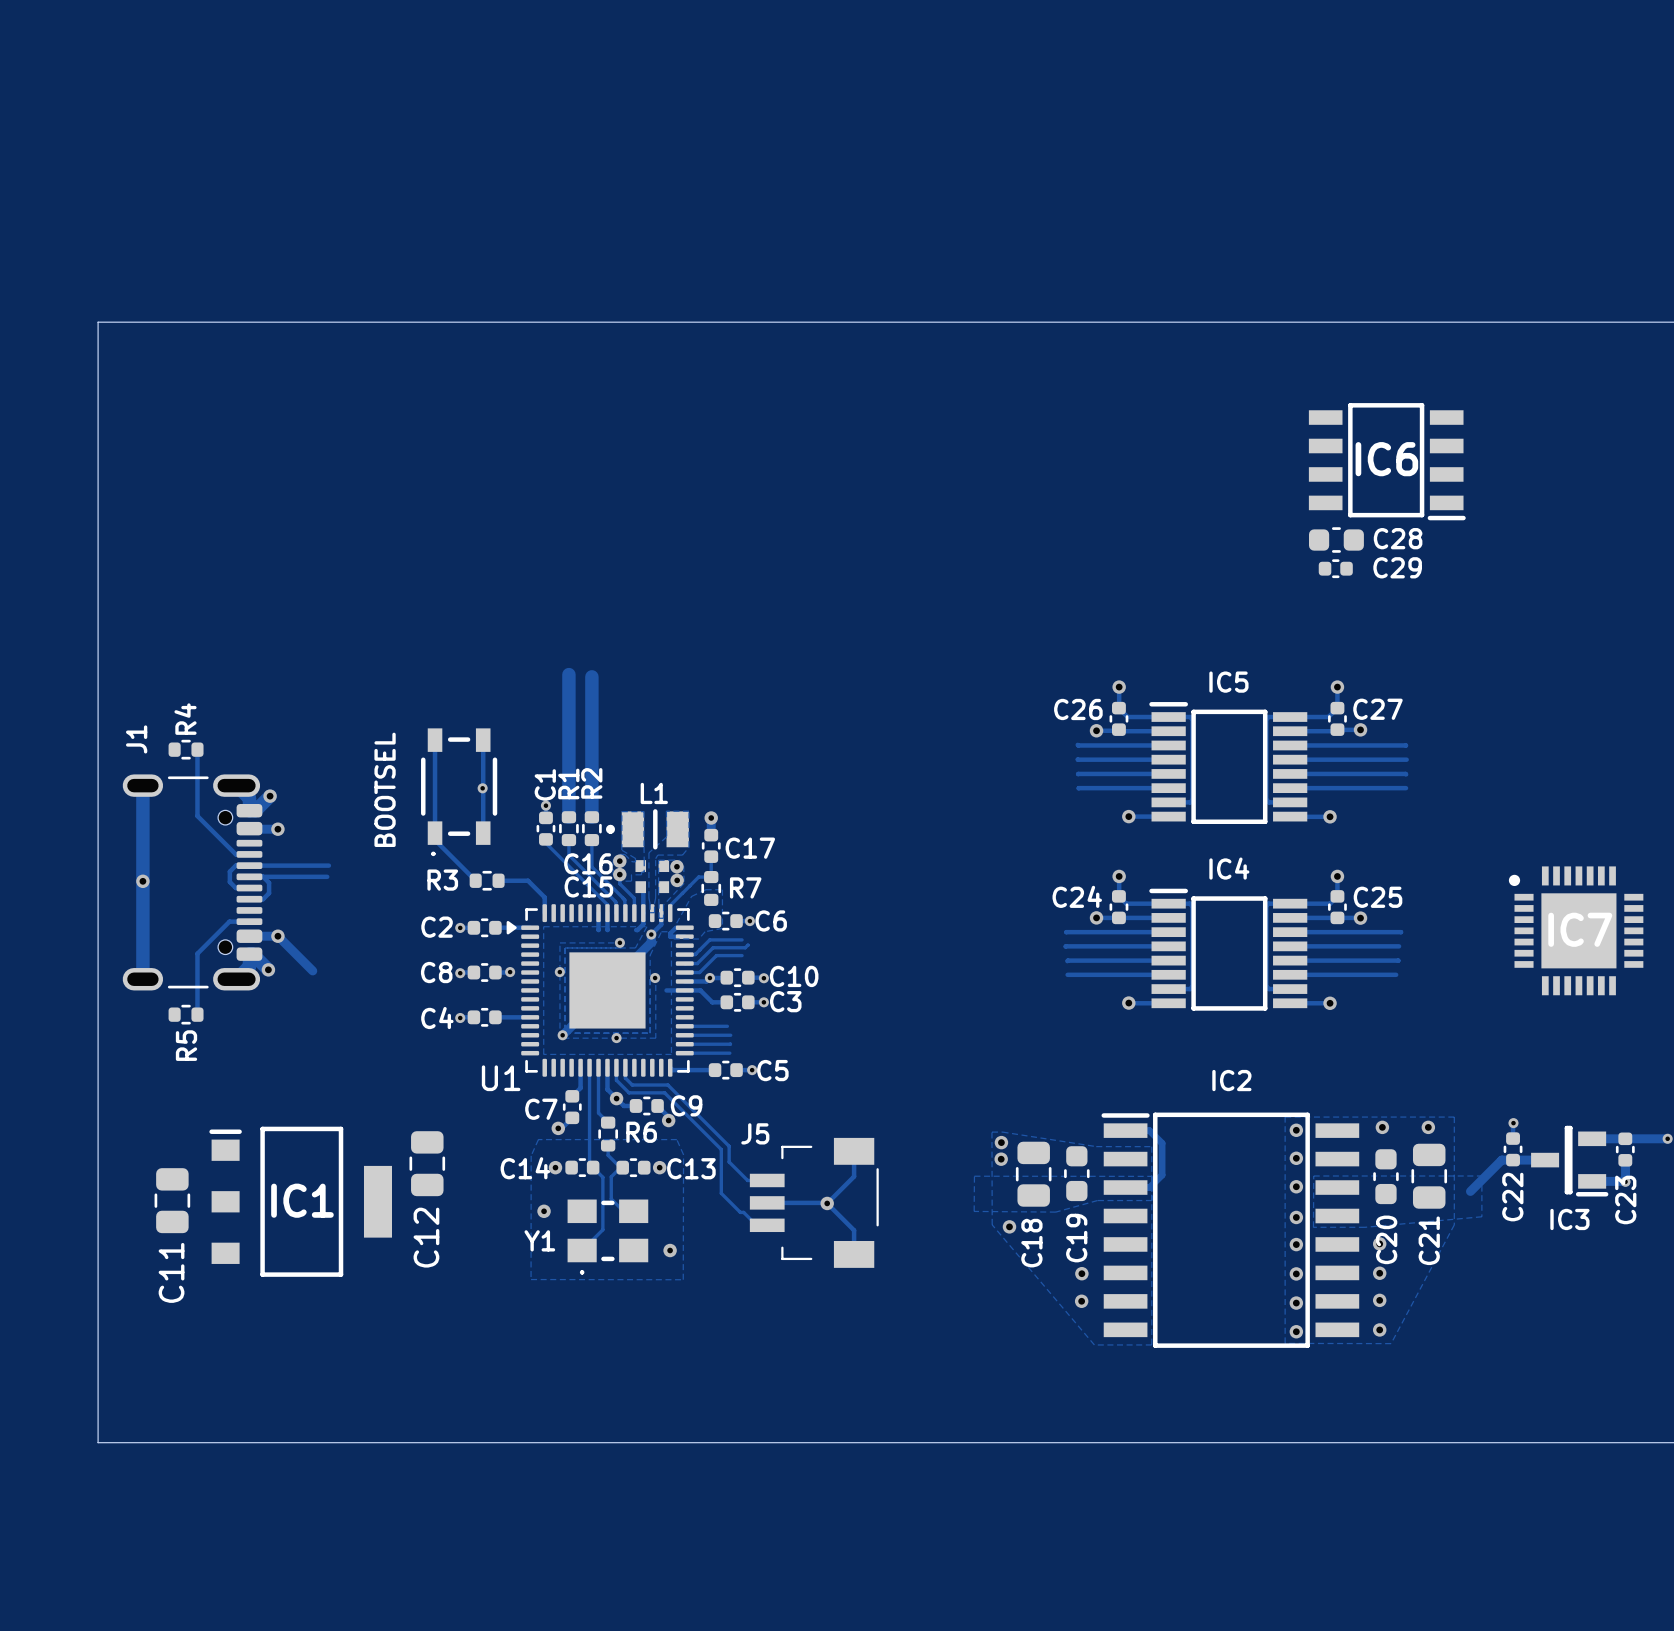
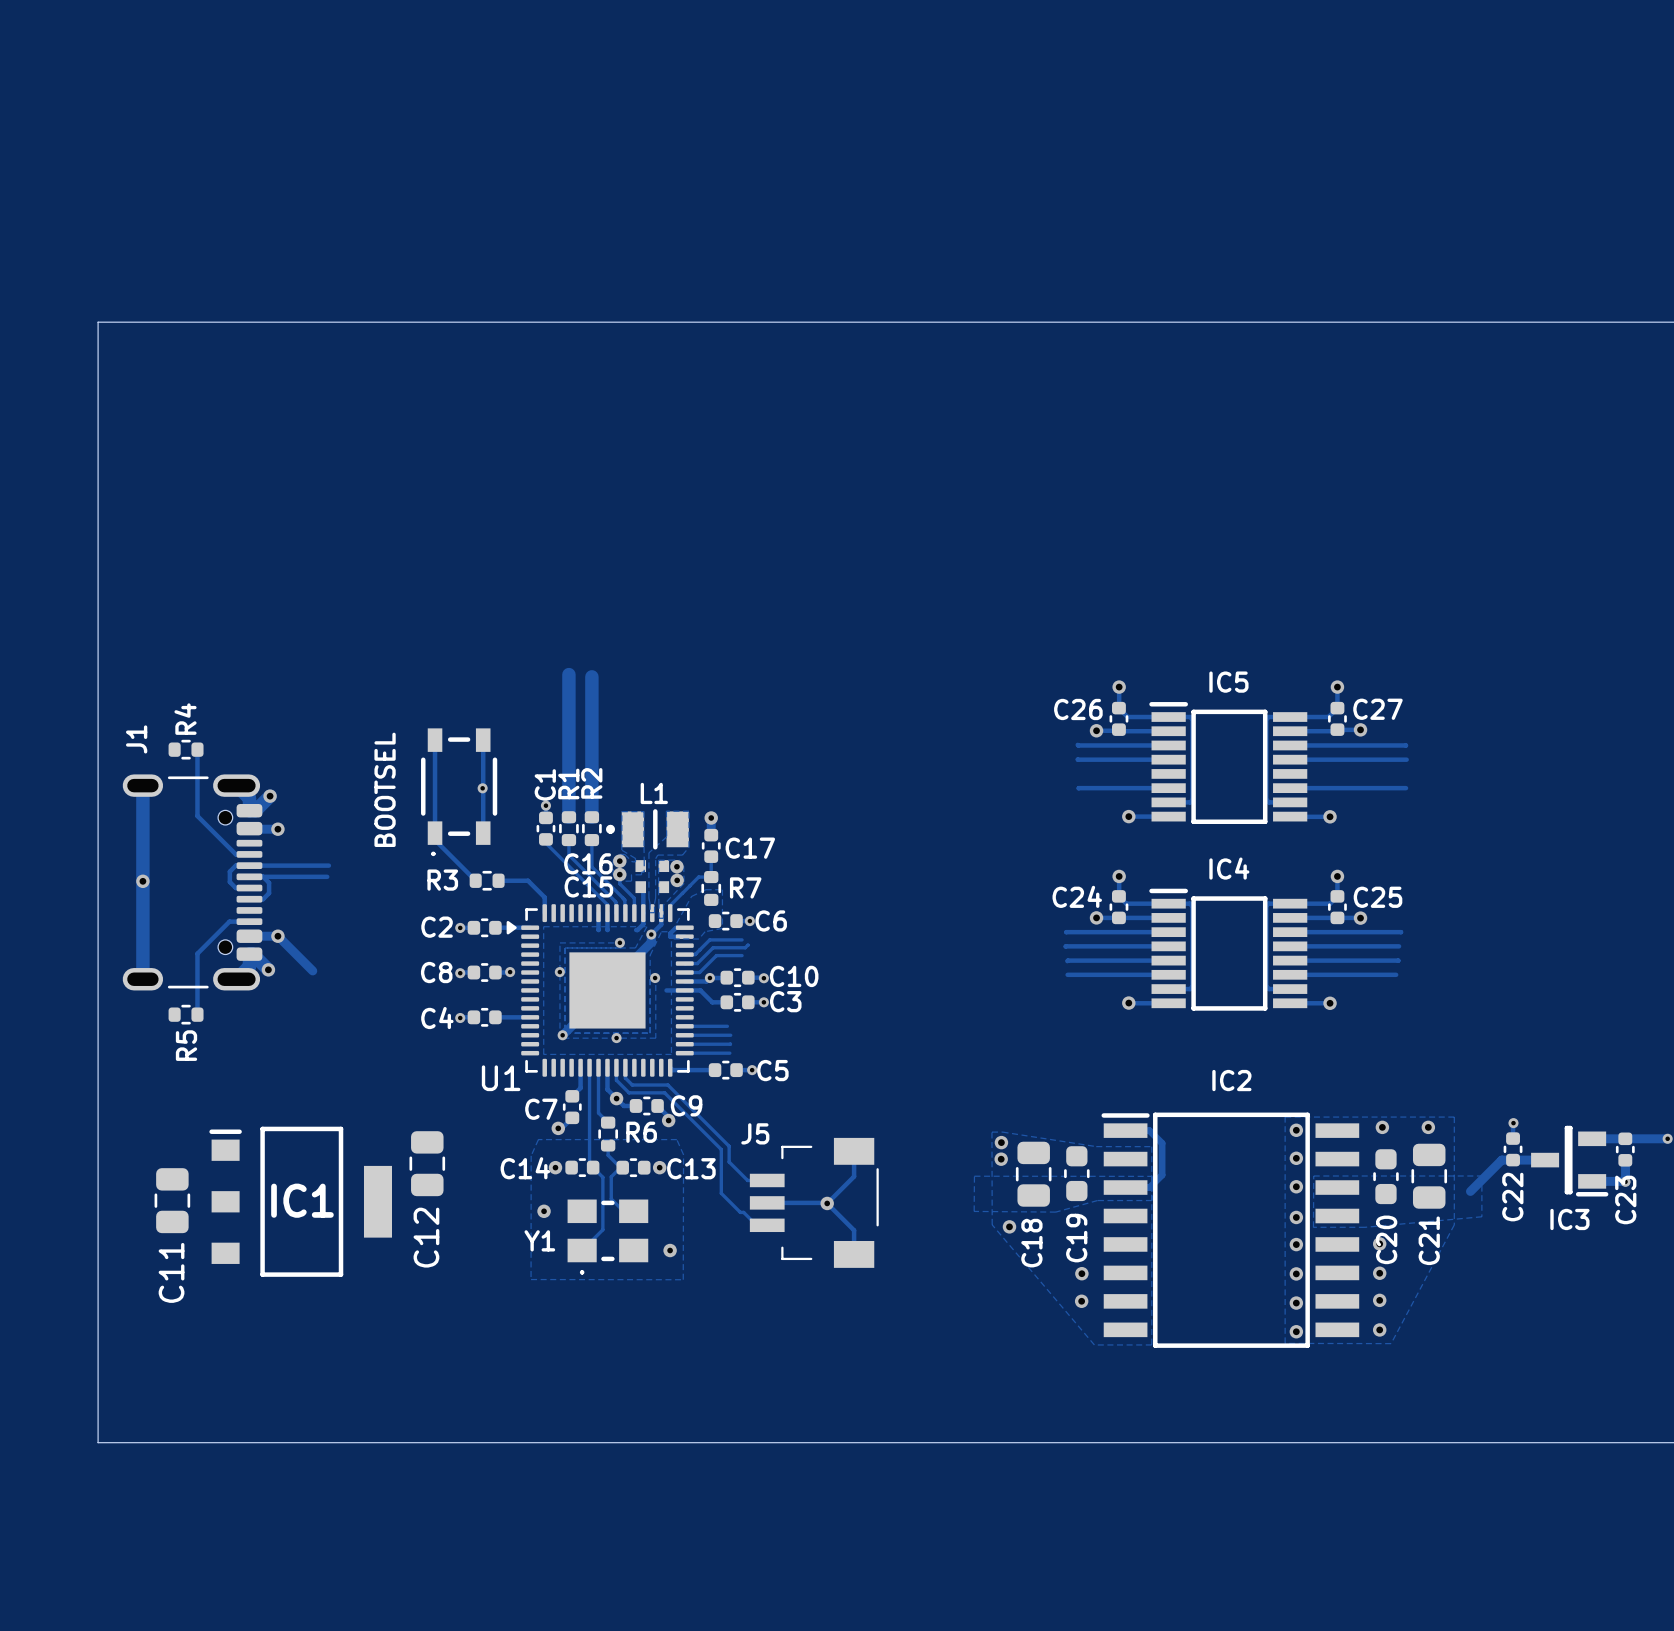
IC6: (1387, 461) -> none
C28: (1336, 540) -> none
C29: (1335, 568) -> none
track: (1078, 773) (1168, 773) -> none
track: (1290, 773) (1406, 774) -> none
part: (1576, 930) -> none

